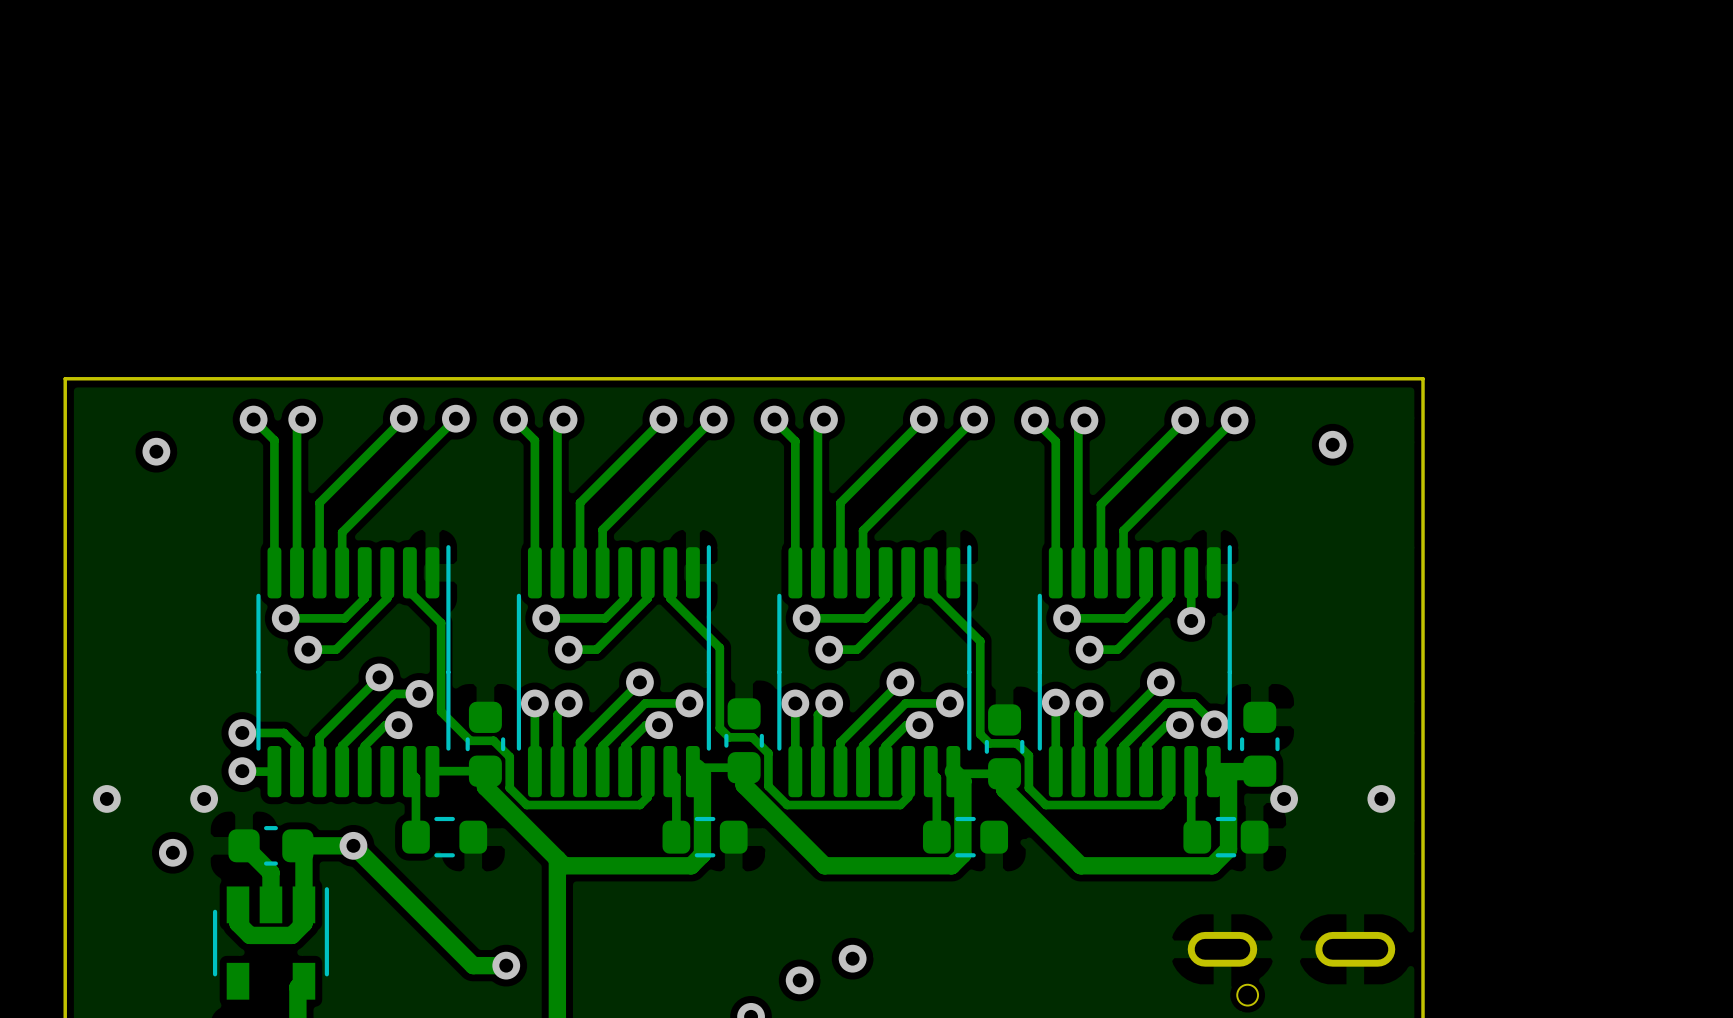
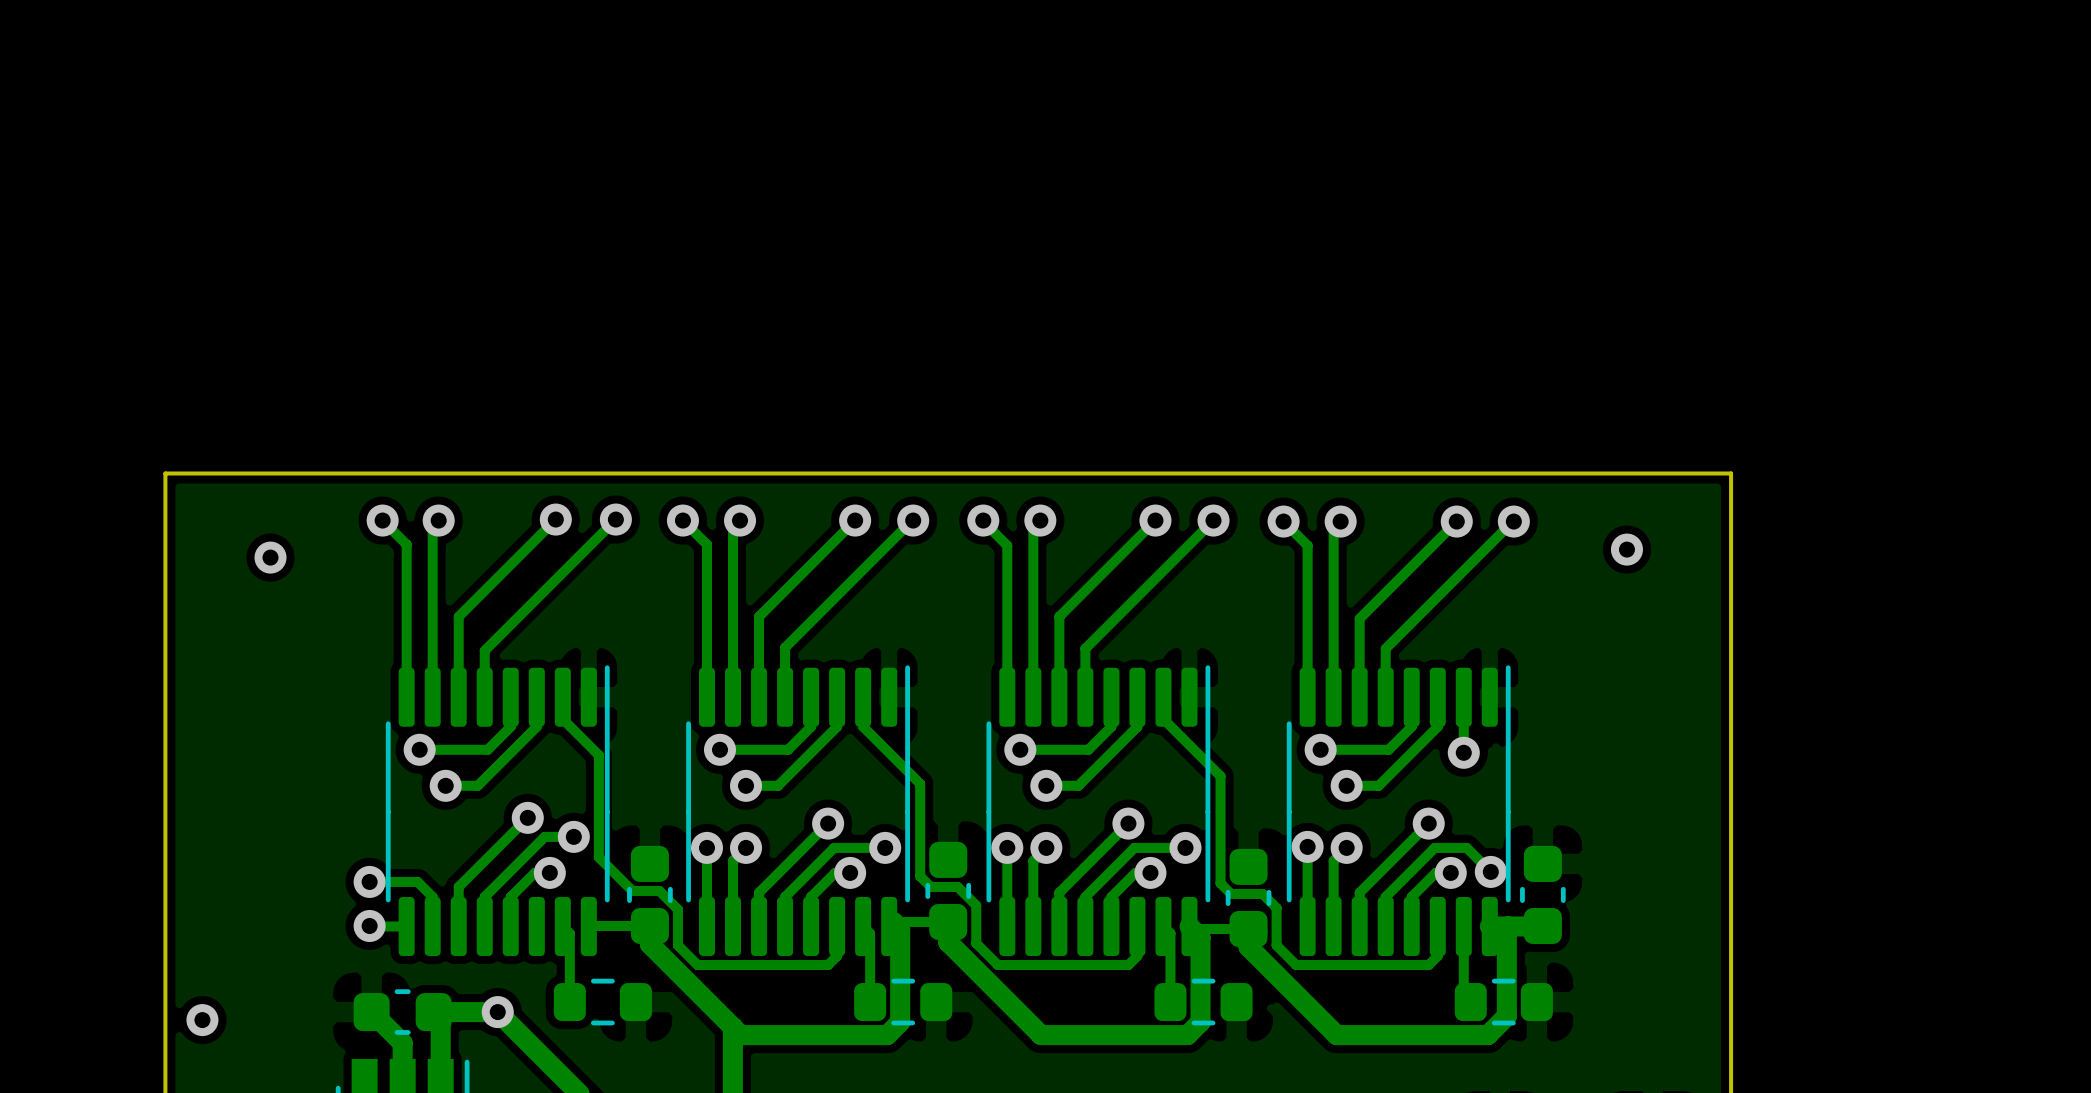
via: (106, 798) -> none
via: (204, 798) -> none
via: (1284, 798) -> none
via: (1381, 798) -> none
via: none -> (202, 1020)
via: (172, 852) -> none

